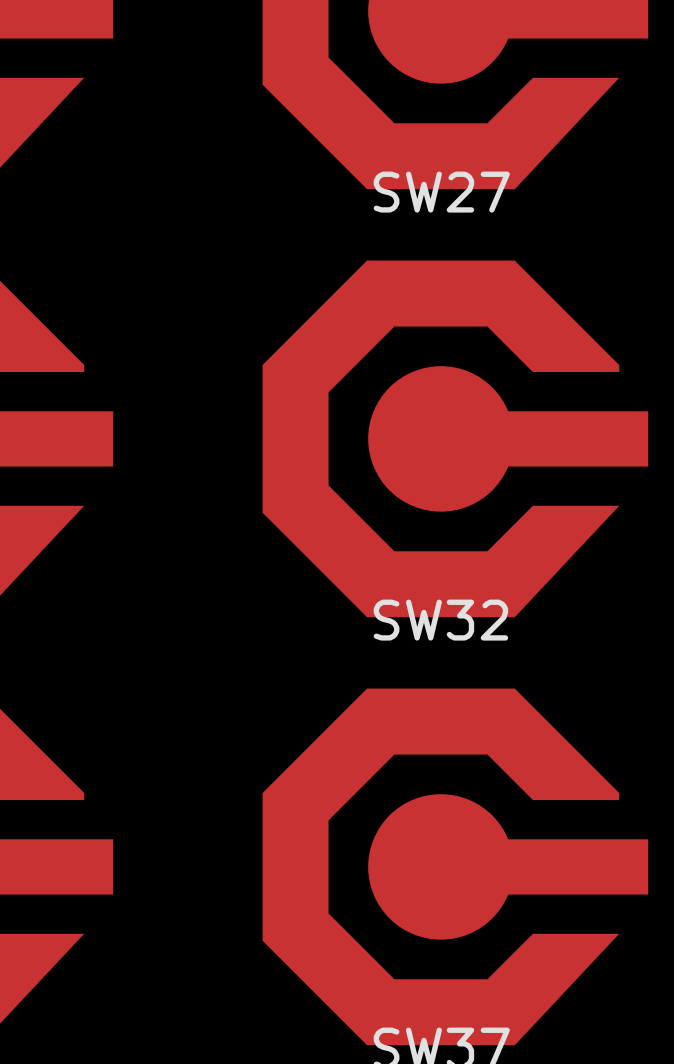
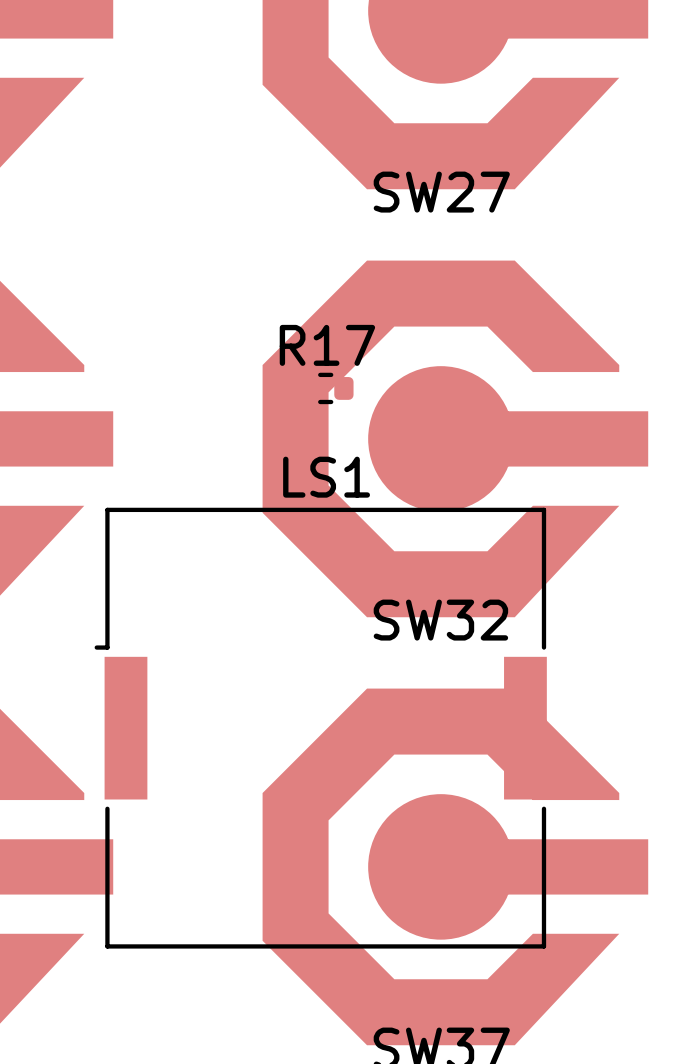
R17: none -> (325, 388)
LS1: none -> (320, 728)

